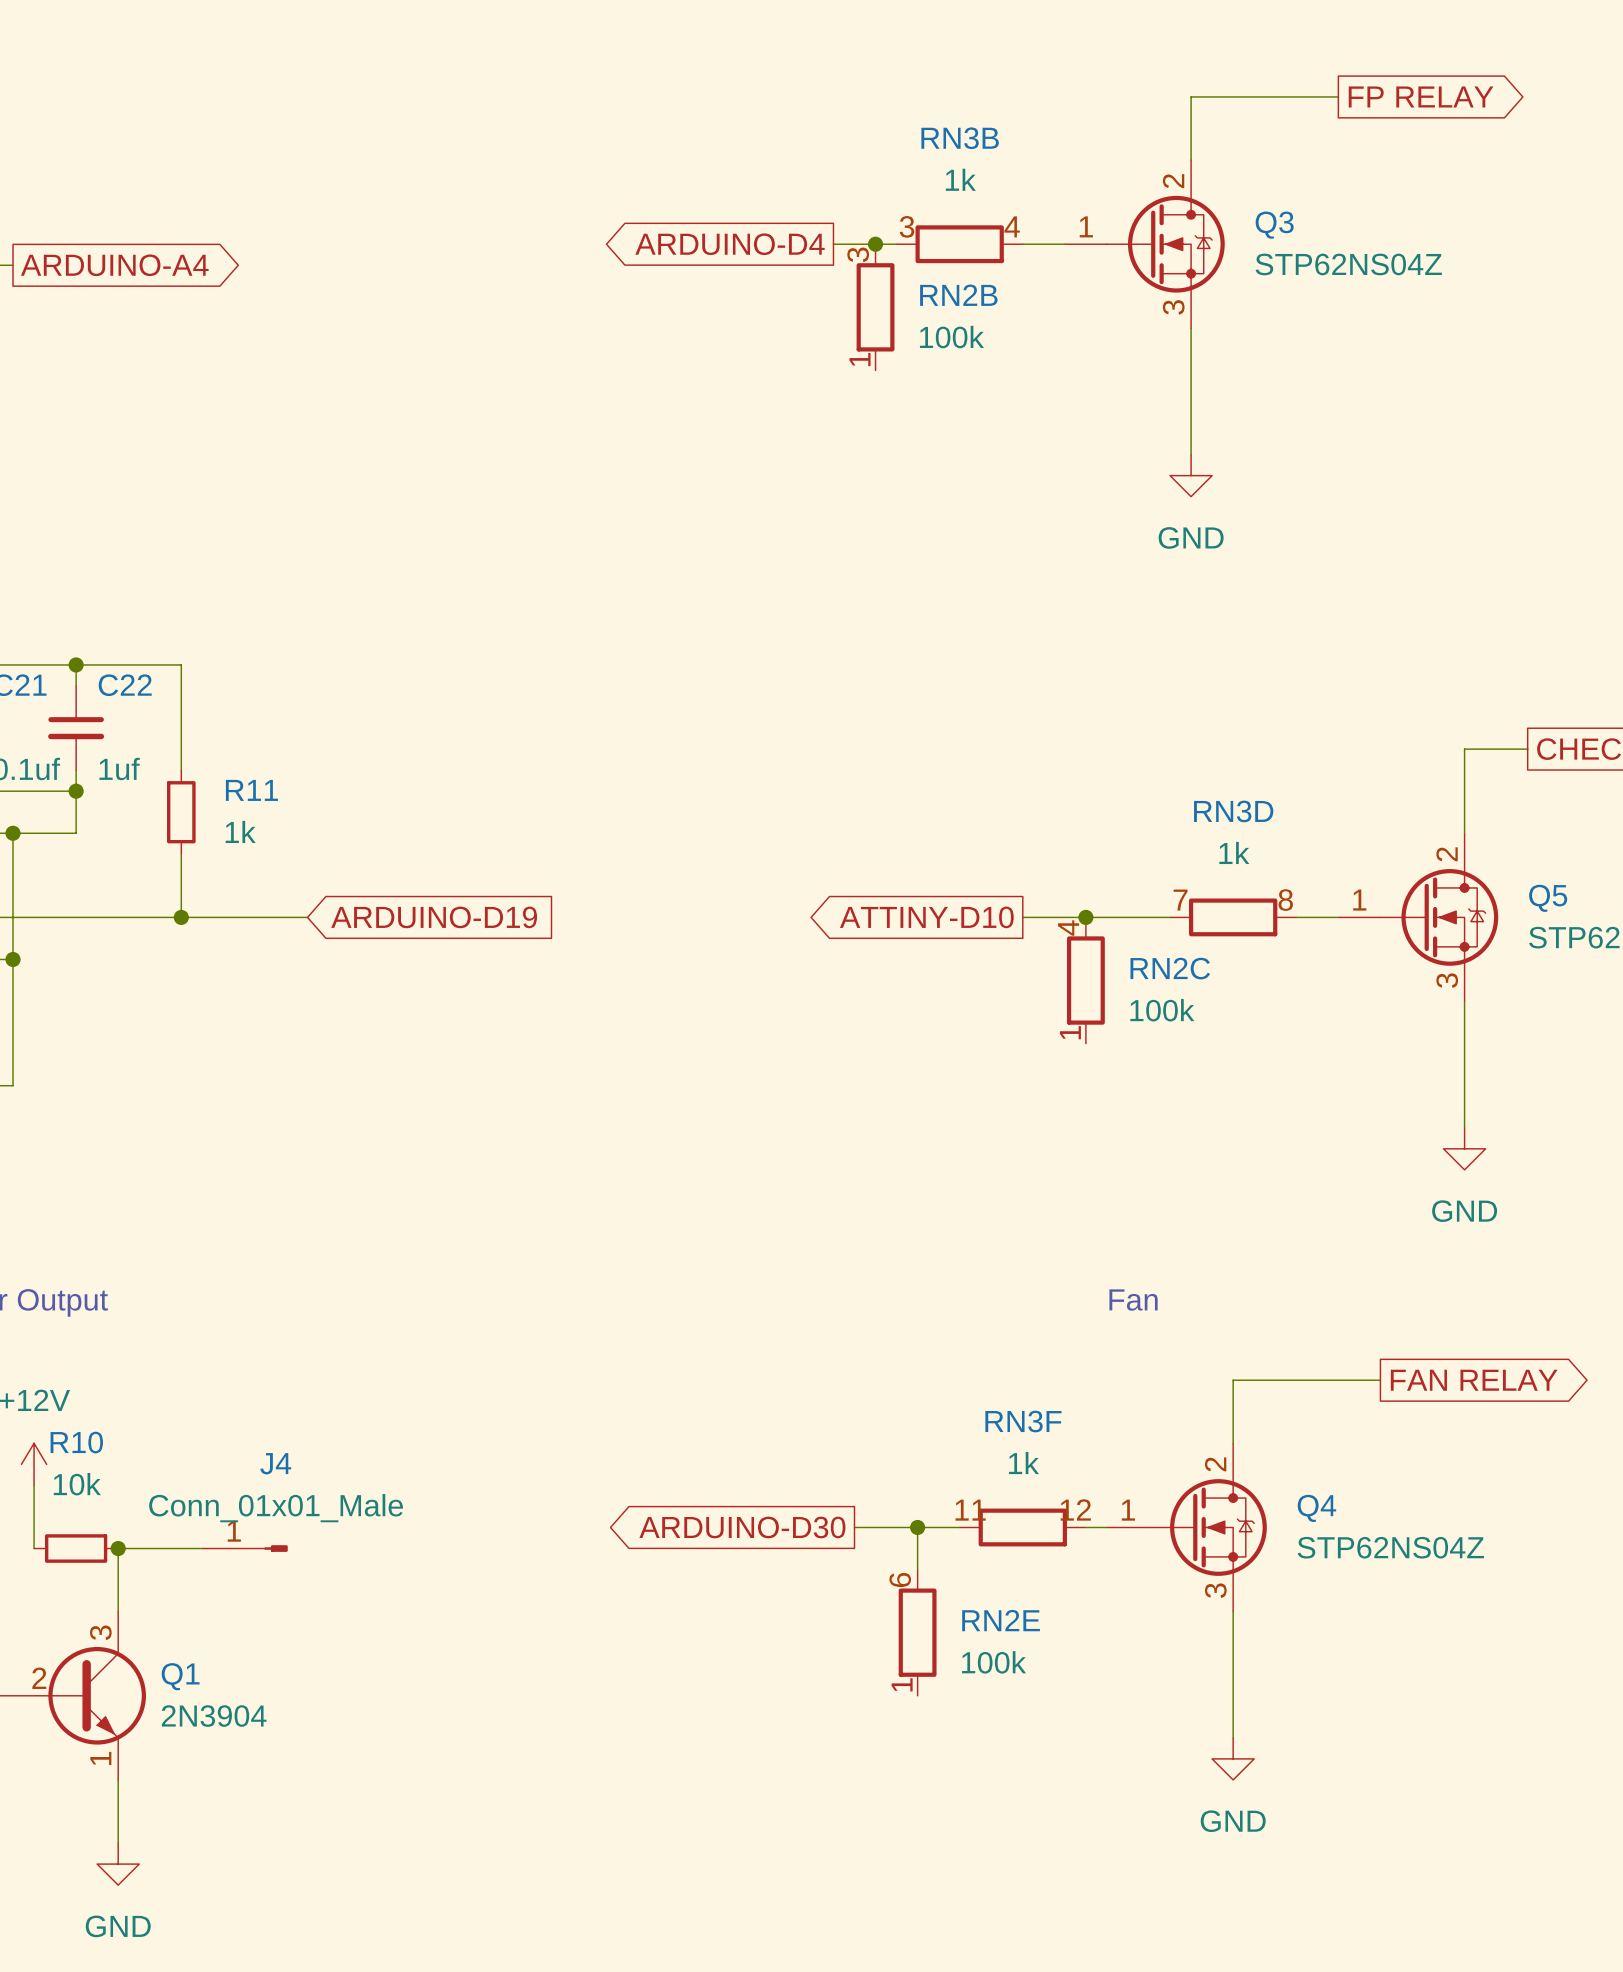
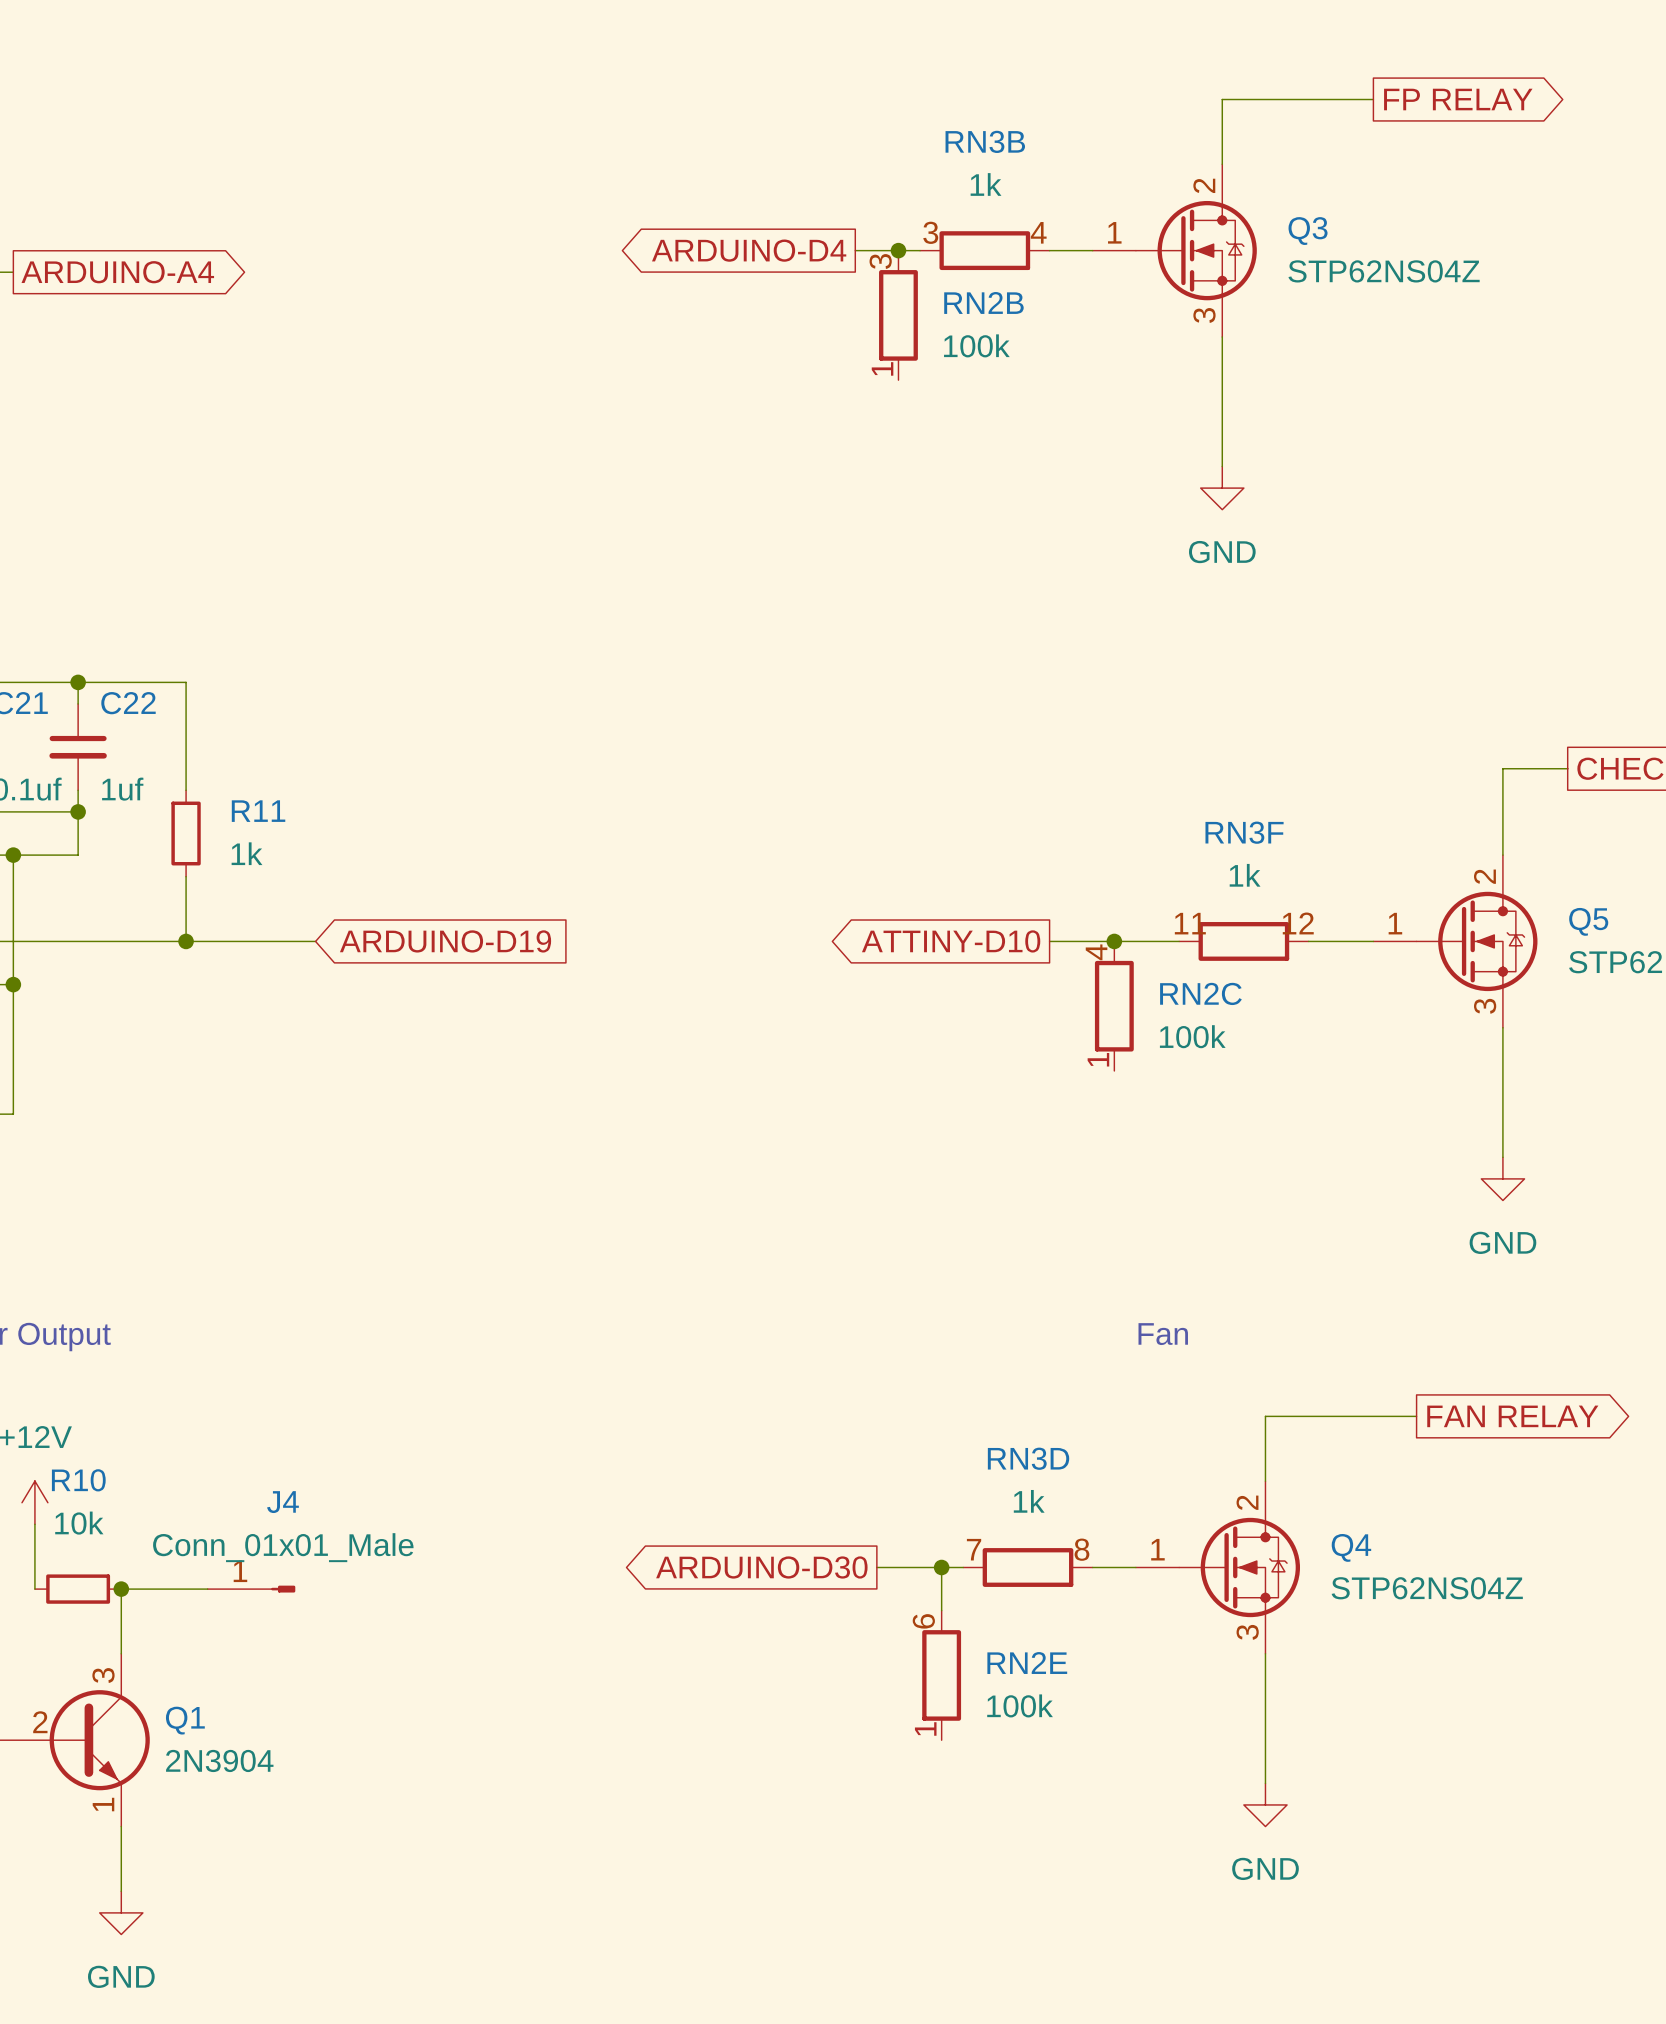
RN3D position: (1233, 917) -> (1027, 1567)
RN3F position: (1022, 1527) -> (1243, 941)

